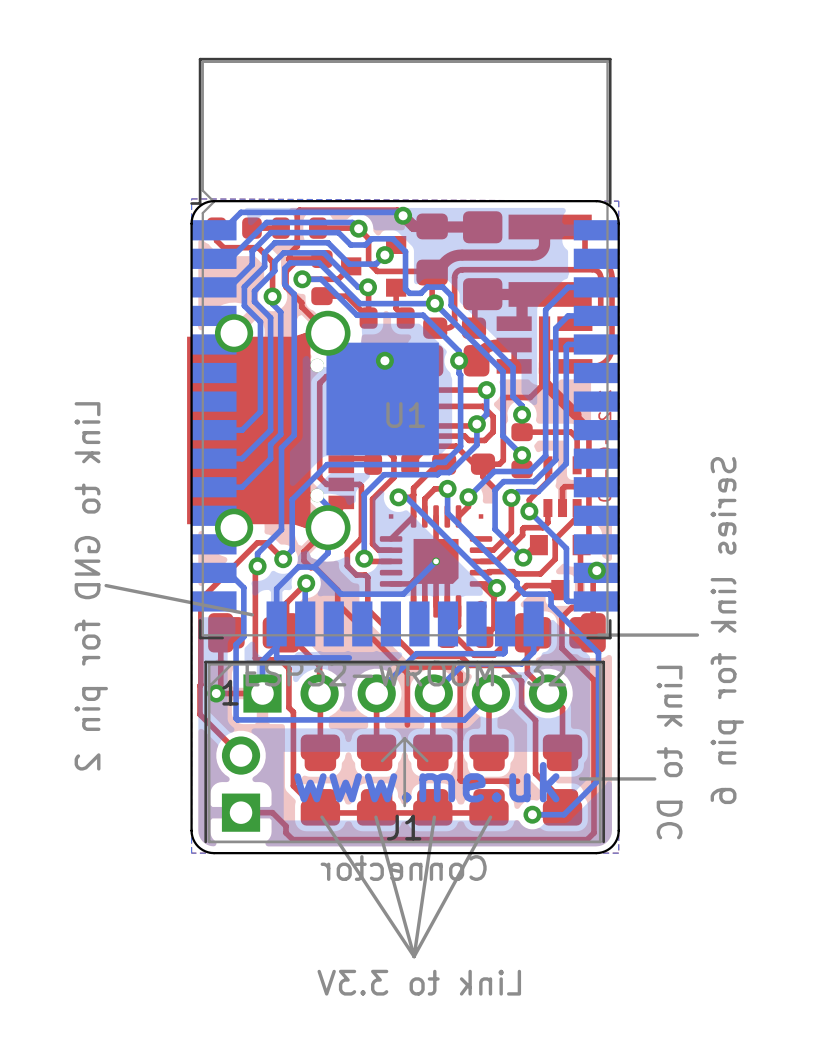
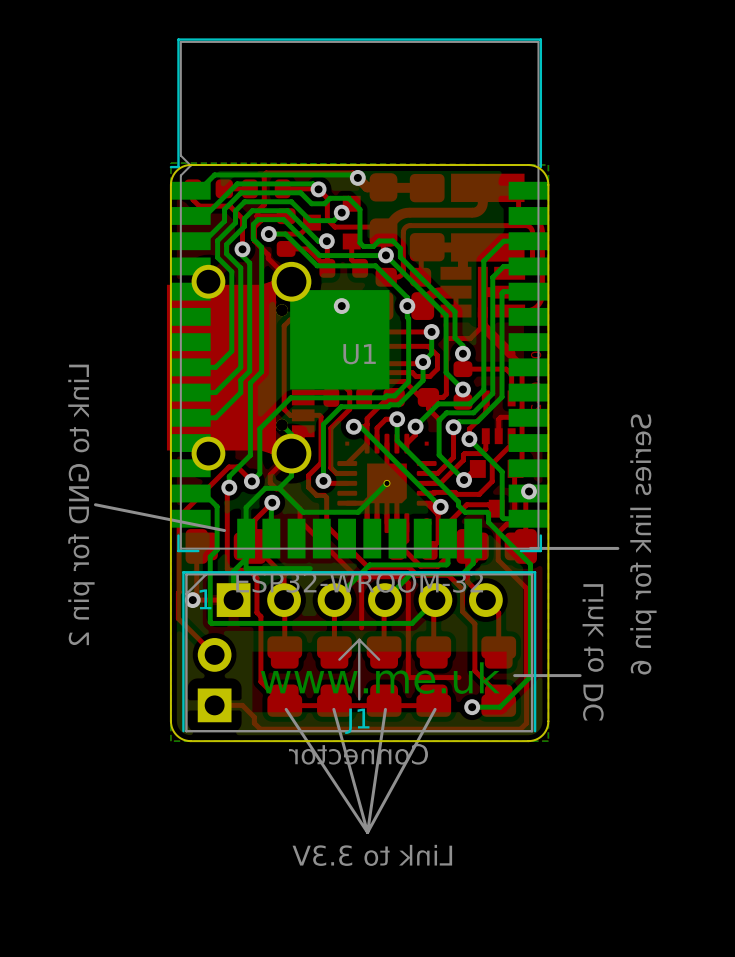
part footprint: [416, 211, 615, 377] -> [369, 173, 545, 320]

